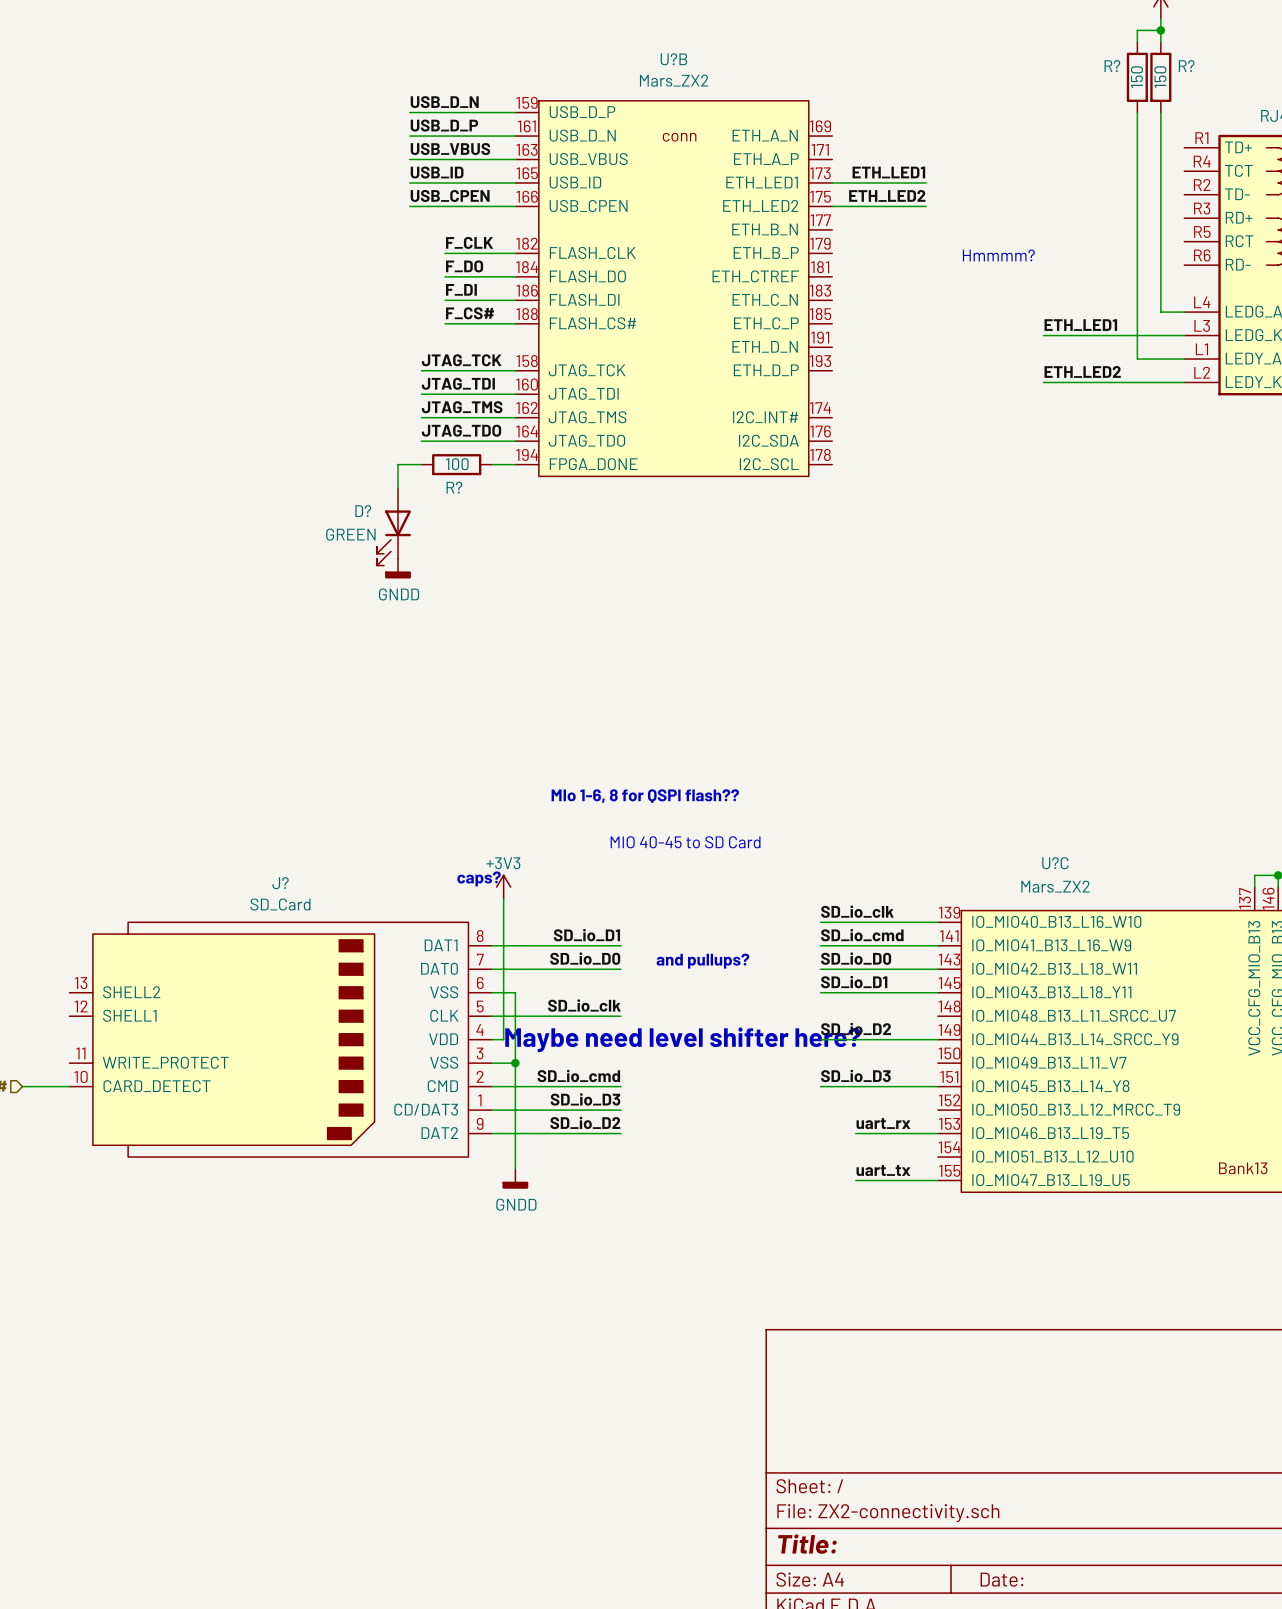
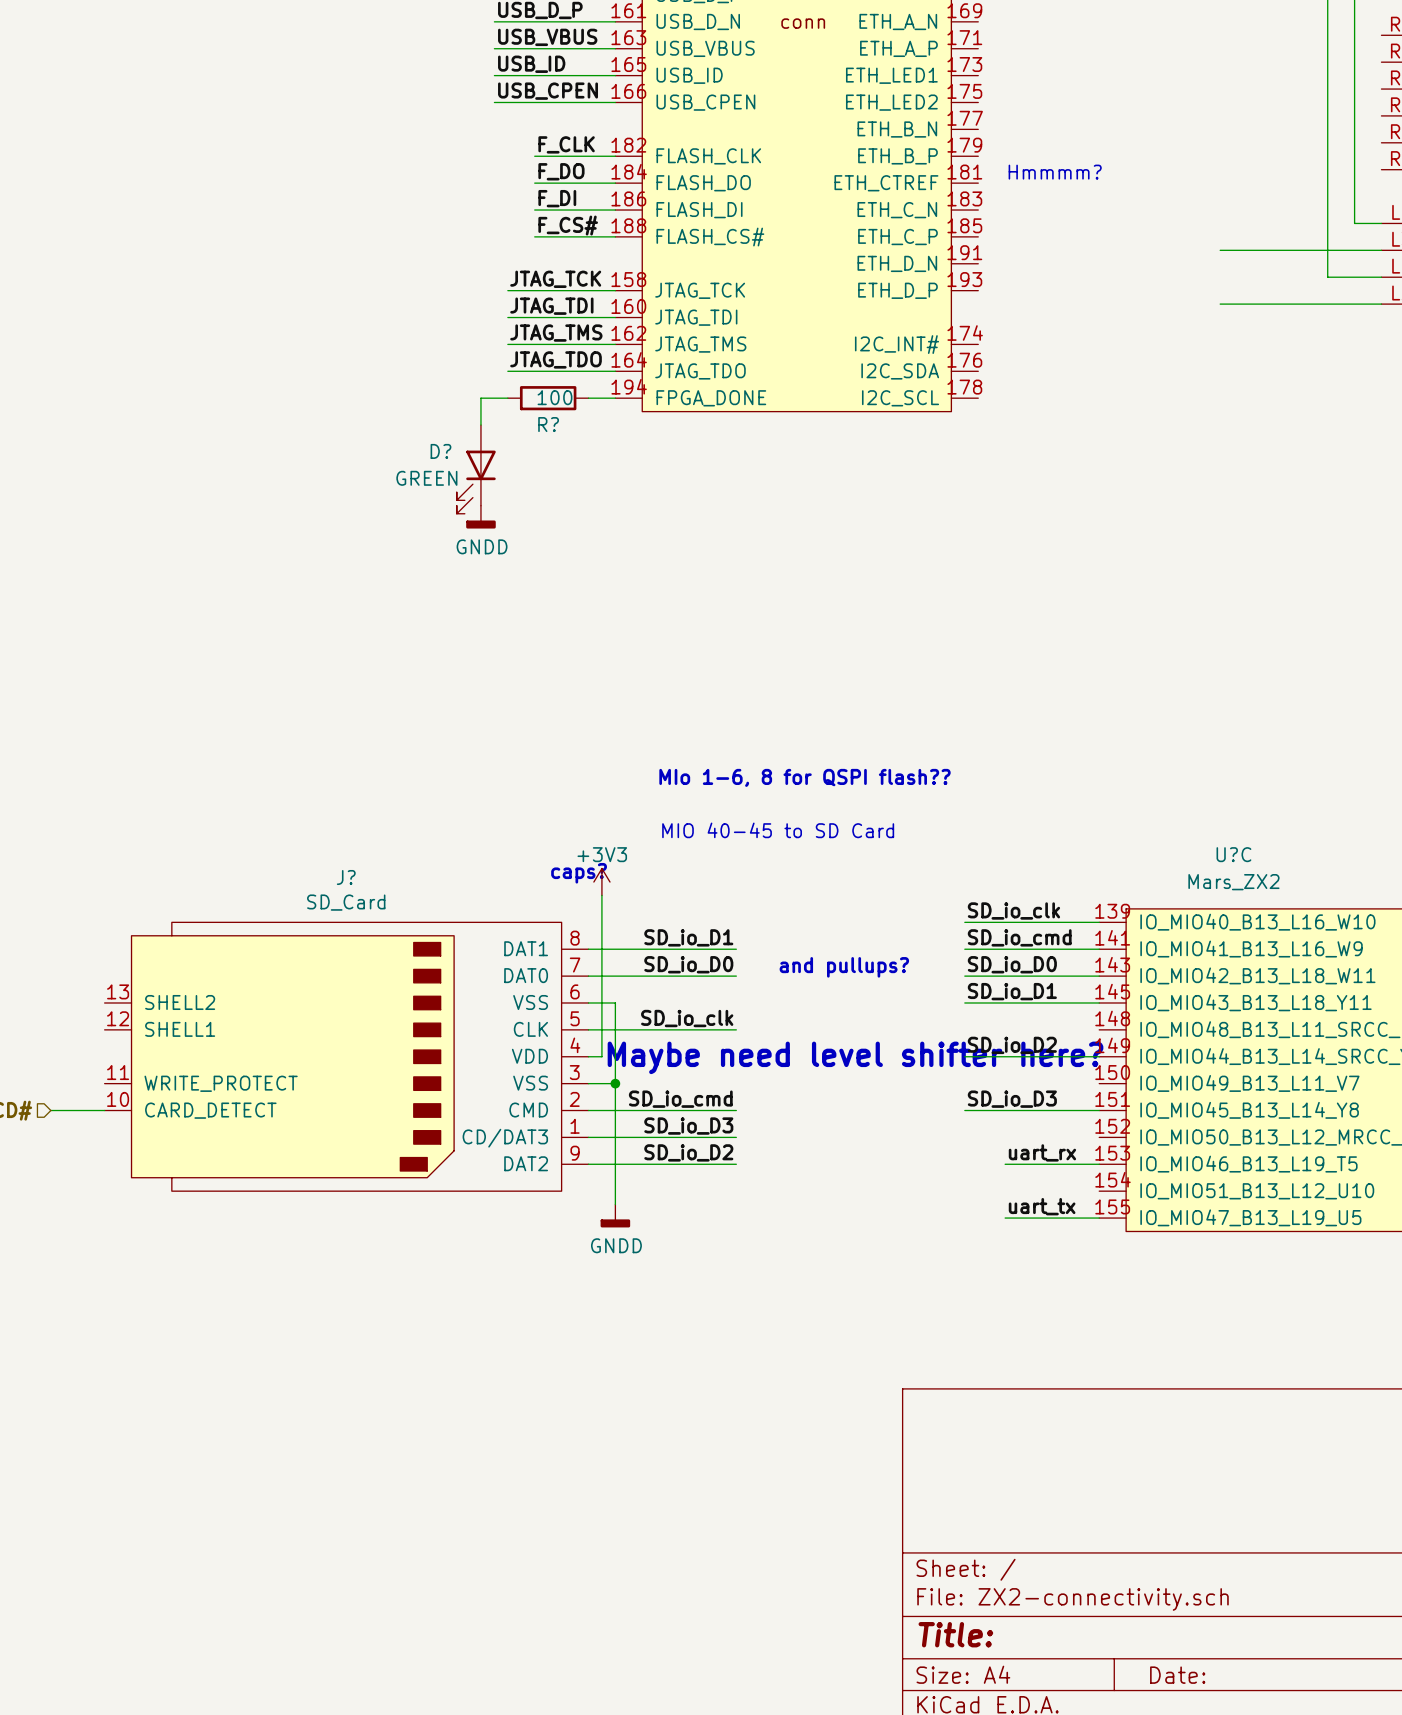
label: ETH_LED1 (888, 172) -> none
wire: (832, 182) (926, 182) -> none
label: ETH_LED2 (887, 195) -> none
wire: (832, 206) (926, 206) -> none
text position: Hmmmm? (998, 255) -> Hmmmm? (1055, 172)
label: ETH_LED1 (1080, 325) -> none
label: ETH_LED2 (1082, 371) -> none

